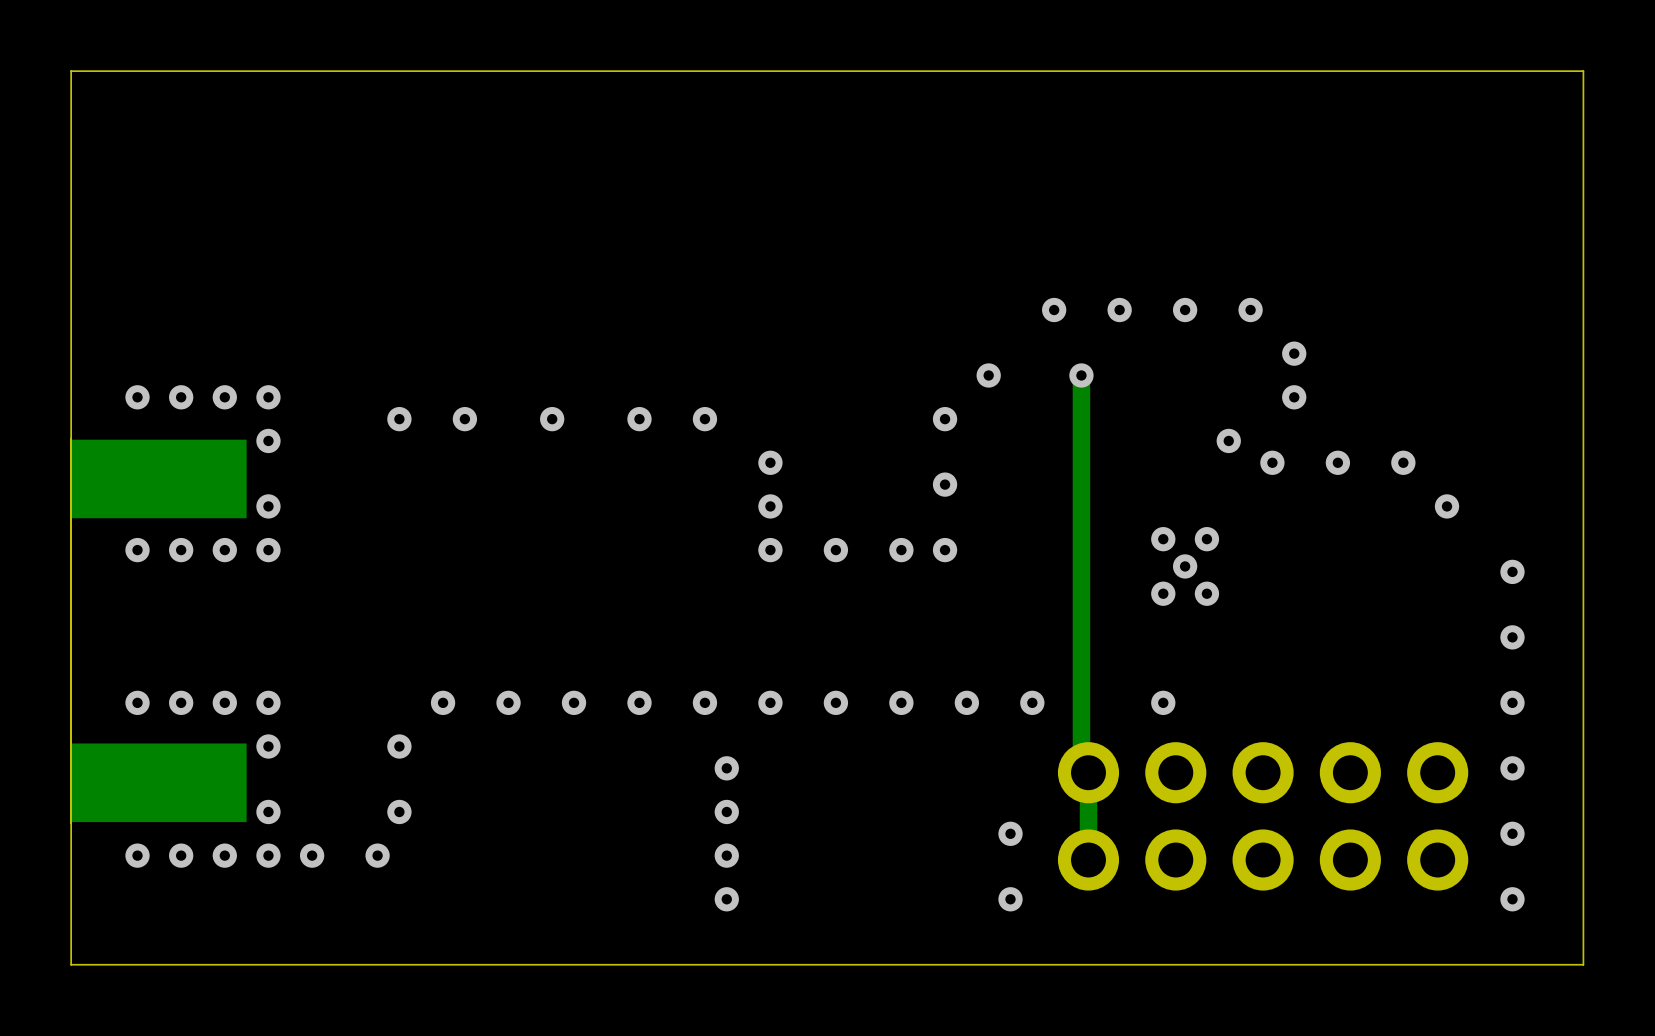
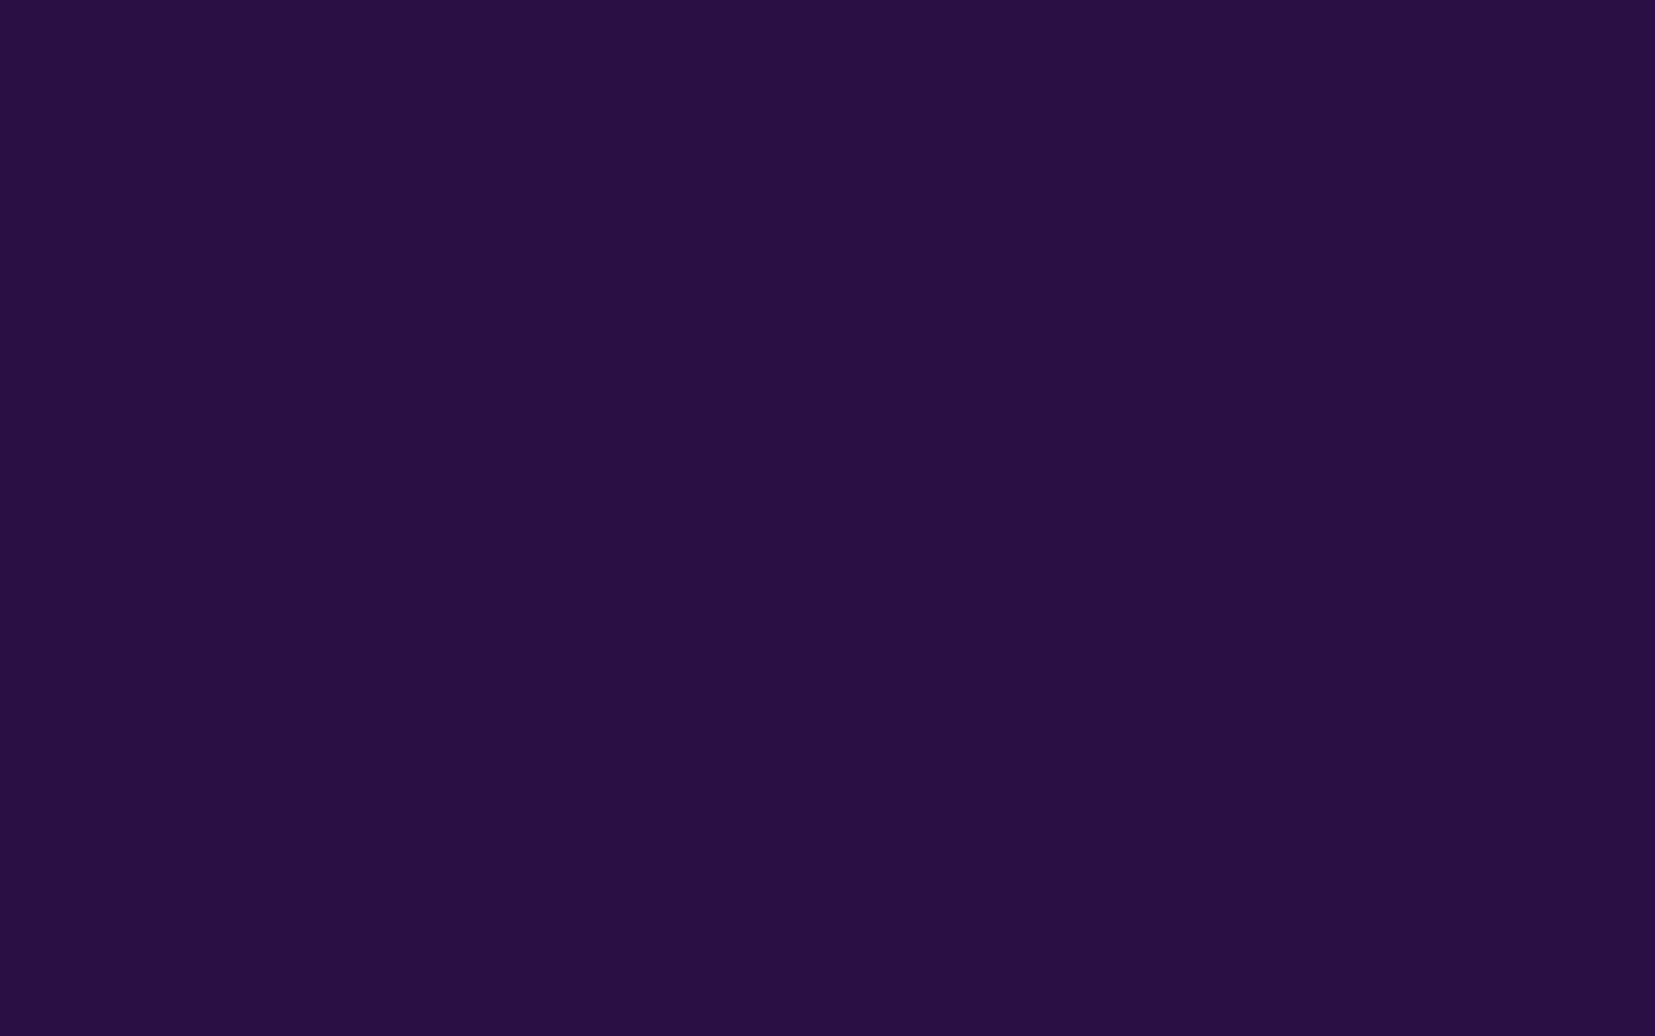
board edge: (1583, 71) (71, 71) (71, 964) (1583, 964) (1583, 71) -> none
via: (1054, 310) -> none
via: (1119, 310) -> none
via: (1185, 310) -> none
via: (1250, 310) -> none
via: (1294, 353) -> none
via: (988, 375) -> none
track: (1081, 375) (1081, 765) (1088, 772) (1088, 860) -> none
via: (1081, 375) -> none
via: (137, 397) -> none
via: (181, 397) -> none
via: (224, 397) -> none
via: (268, 397) -> none
via: (1294, 397) -> none
via: (399, 419) -> none
via: (464, 419) -> none
via: (552, 419) -> none
via: (639, 419) -> none
via: (704, 419) -> none
via: (945, 419) -> none
via: (268, 440) -> none
via: (1228, 440) -> none
via: (770, 462) -> none
via: (1272, 462) -> none
via: (1337, 462) -> none
via: (1403, 462) -> none
via: (945, 484) -> none
via: (268, 506) -> none
via: (770, 506) -> none
via: (1447, 506) -> none
via: (1163, 539) -> none
via: (1206, 539) -> none
via: (137, 550) -> none
via: (181, 550) -> none
via: (224, 550) -> none
via: (268, 550) -> none
via: (770, 550) -> none
via: (835, 550) -> none
via: (901, 550) -> none
via: (945, 550) -> none
via: (1185, 566) -> none
via: (1512, 571) -> none
via: (1163, 593) -> none
via: (1206, 593) -> none
part: (158, 630) -> none
via: (1512, 637) -> none
via: (137, 702) -> none
via: (181, 702) -> none
via: (224, 702) -> none
via: (268, 702) -> none
via: (443, 702) -> none
via: (508, 702) -> none
via: (574, 702) -> none
via: (639, 702) -> none
via: (704, 702) -> none
via: (770, 702) -> none
via: (835, 702) -> none
via: (901, 702) -> none
via: (966, 702) -> none
via: (1032, 702) -> none
via: (1163, 702) -> none
via: (1512, 702) -> none
via: (268, 746) -> none
via: (399, 746) -> none
via: (726, 768) -> none
via: (1512, 768) -> none
via: (268, 811) -> none
via: (399, 811) -> none
via: (726, 811) -> none
part: (1263, 816) -> none
via: (1010, 833) -> none
via: (1512, 833) -> none
via: (137, 855) -> none
via: (181, 855) -> none
via: (224, 855) -> none
via: (268, 855) -> none
via: (312, 855) -> none
via: (377, 855) -> none
via: (726, 855) -> none
via: (726, 899) -> none
via: (1010, 899) -> none
via: (1512, 899) -> none

